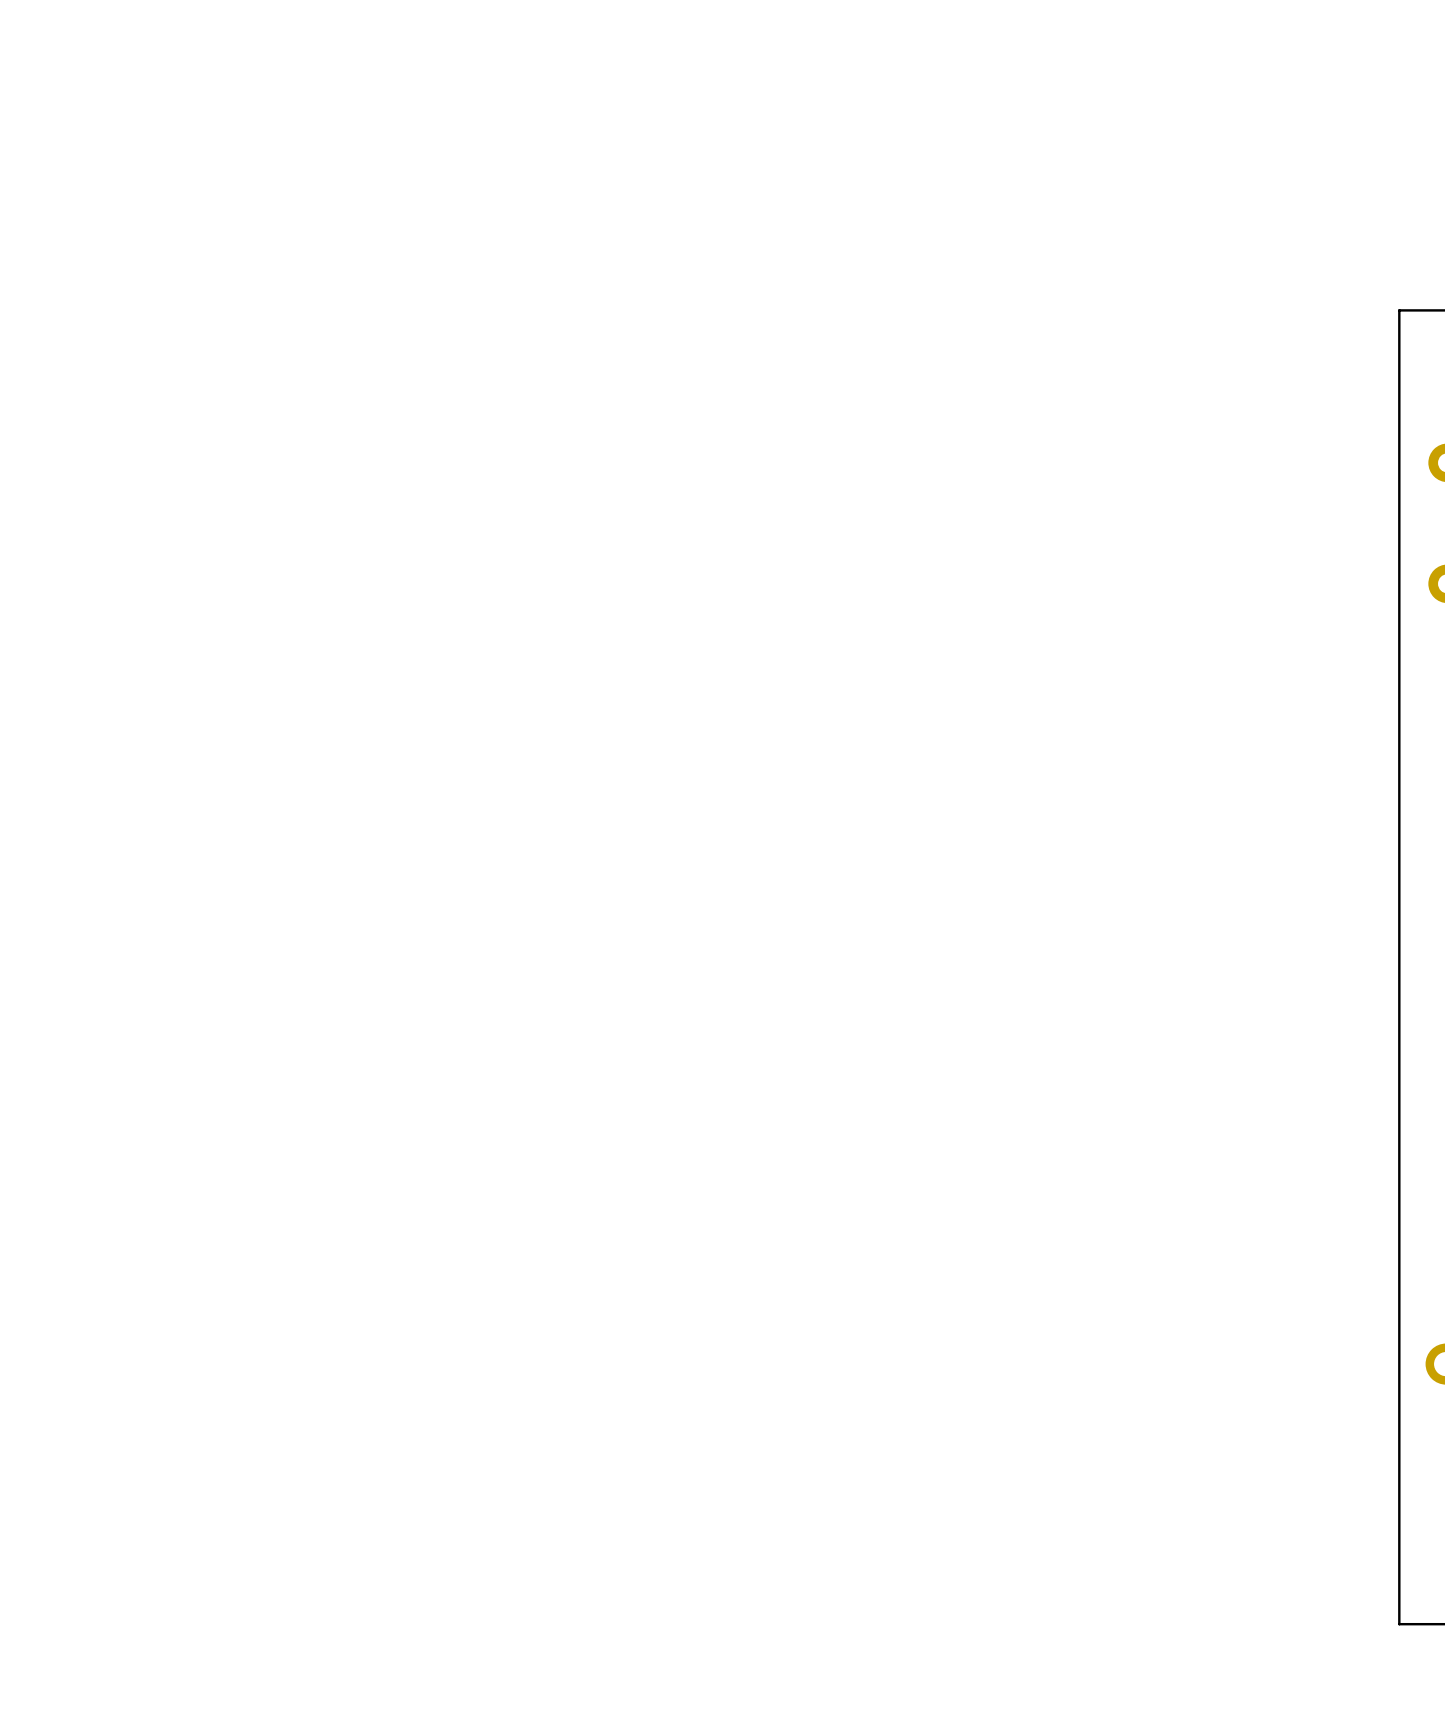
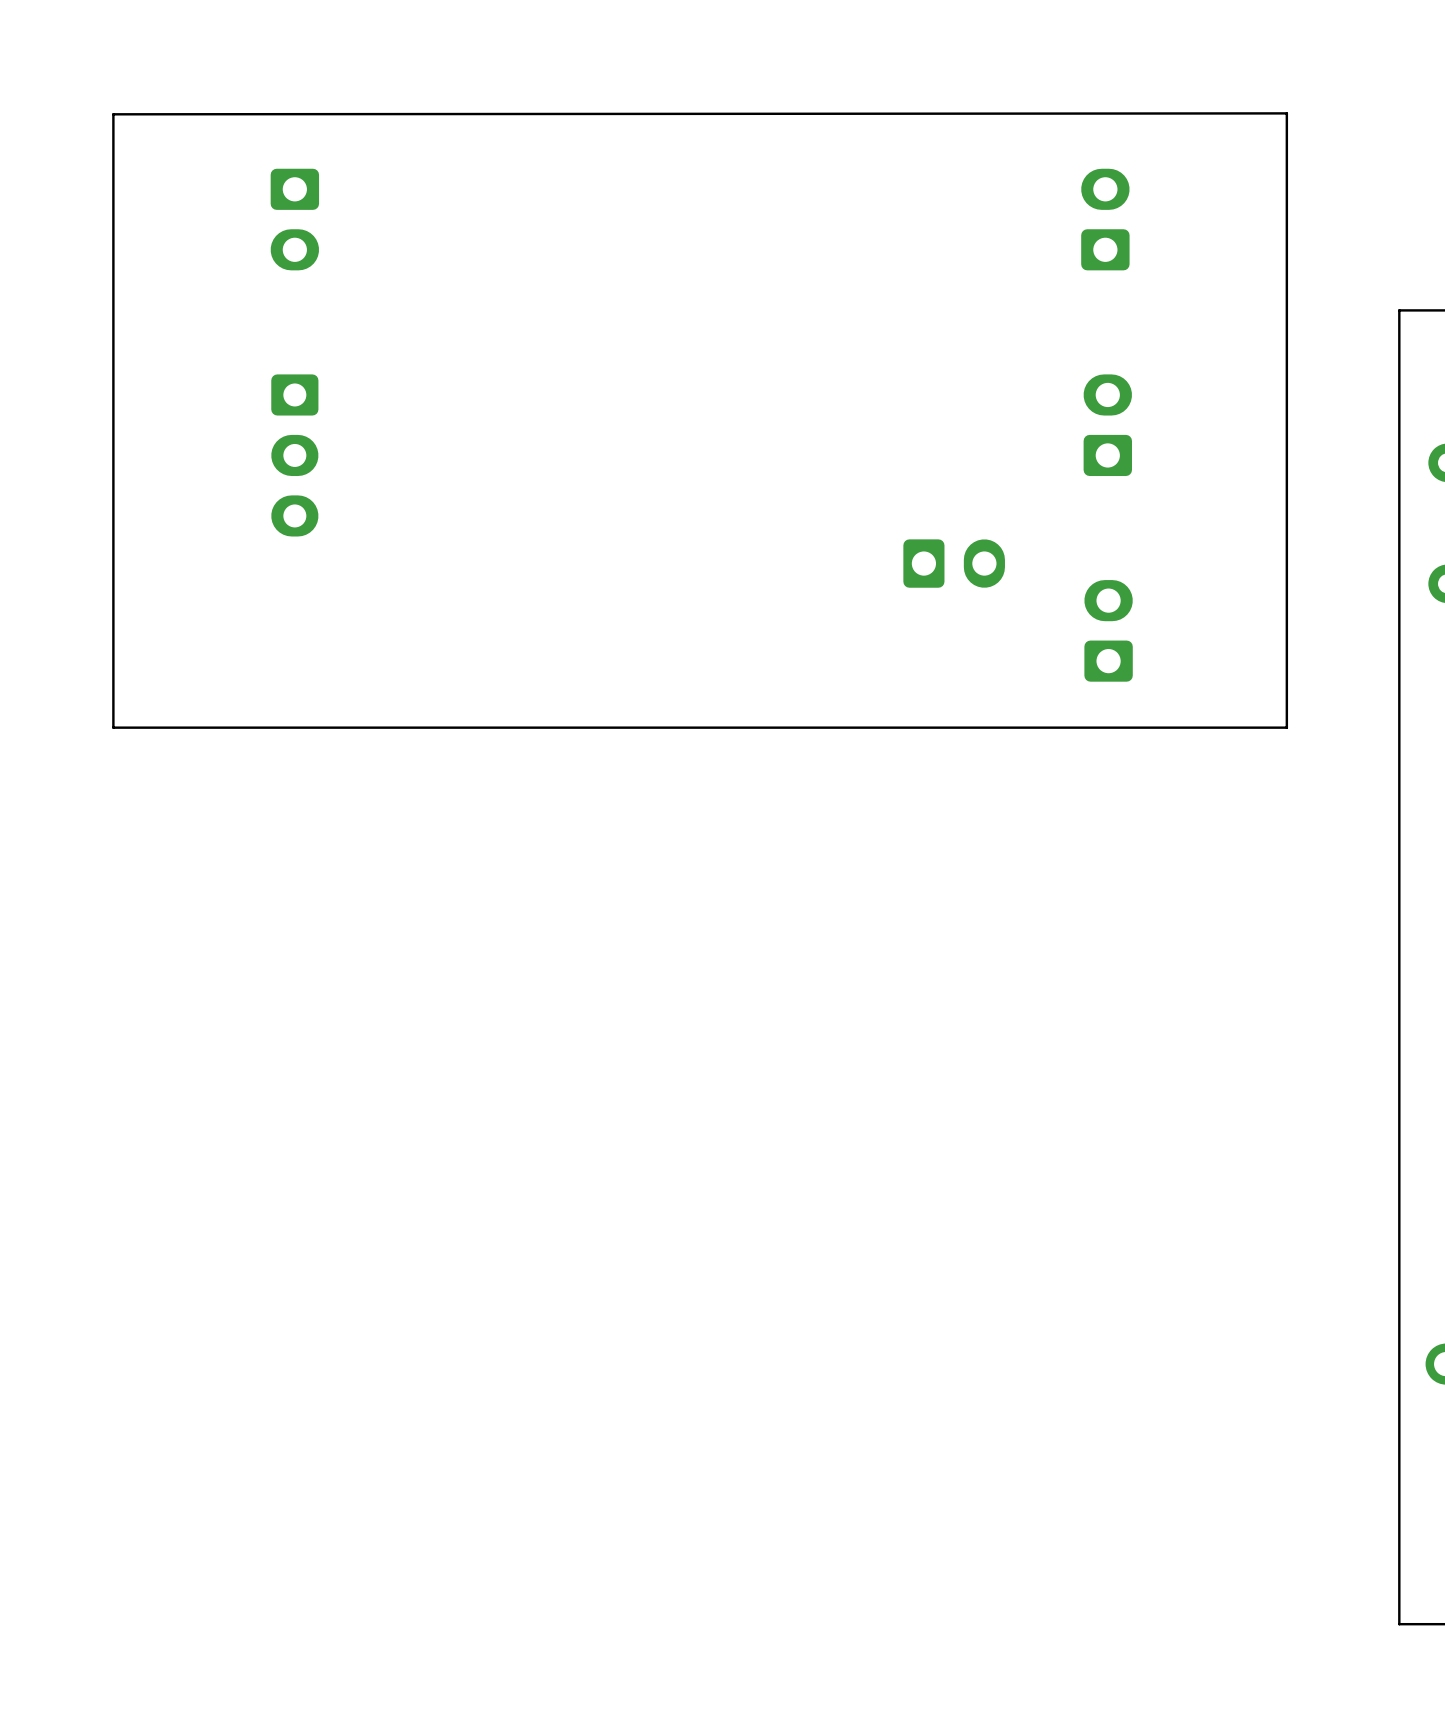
board edge: none -> (1286, 113) (113, 114) (113, 727) (1286, 727) (1286, 113)
part: none -> (294, 219)
part: none -> (1105, 219)
part: none -> (1107, 425)
part: none -> (294, 455)
part: none -> (954, 563)
part: none -> (1108, 630)

